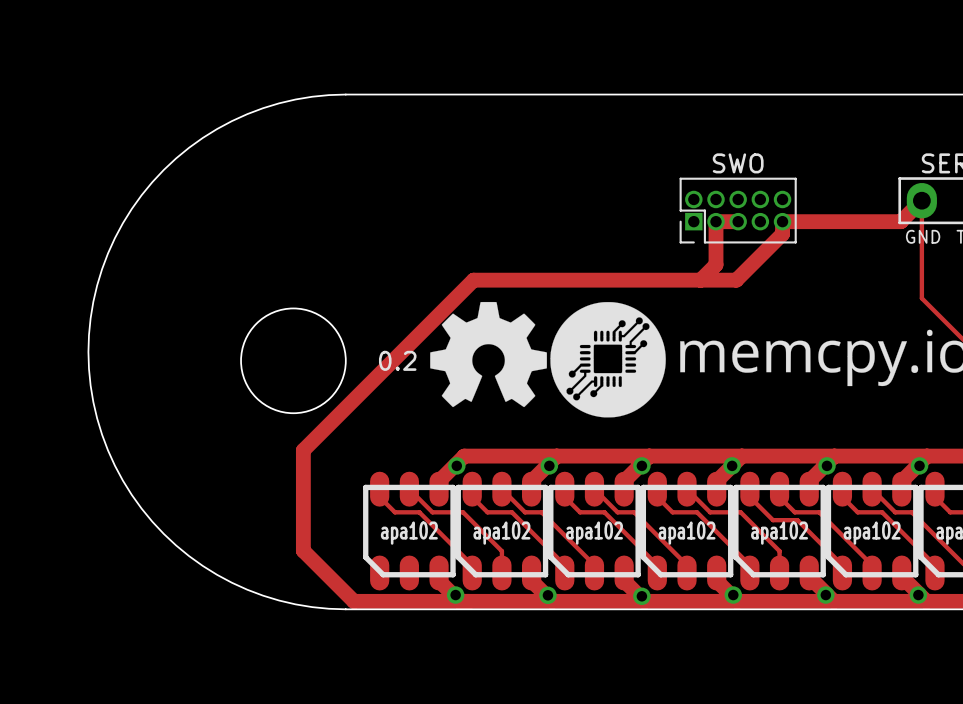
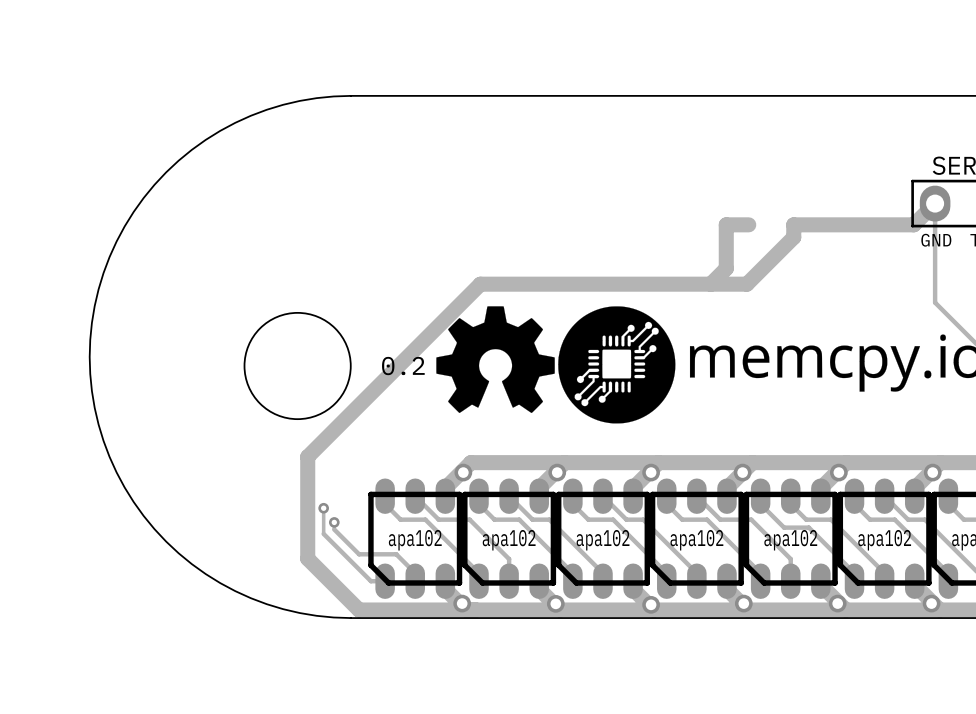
SWO: (738, 210) -> none
track: none -> (323, 508) (323, 533) (370, 581) (385, 581)
via: none -> (323, 508)
track: none -> (334, 522) (334, 529) (359, 554) (396, 554) (415, 573) (415, 581)
via: none -> (334, 522)

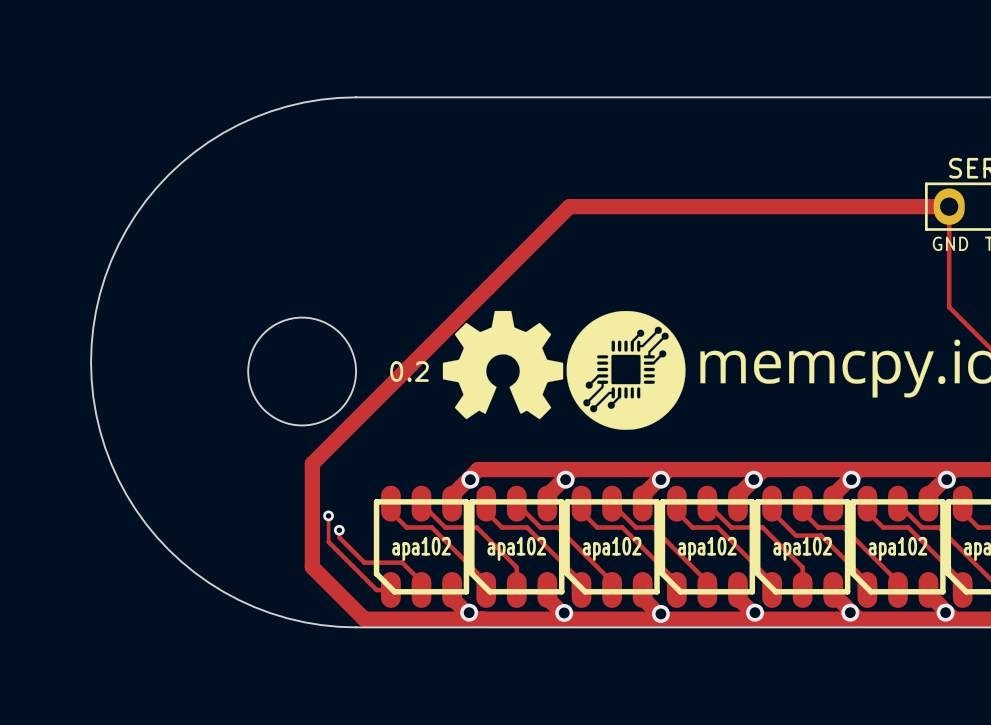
track: (935, 203) (913, 224) (793, 224) (793, 237) (746, 284) (480, 284) -> (949, 206) (569, 206) (487, 288)
track: (748, 224) (726, 224) (726, 268) (710, 284) -> none

